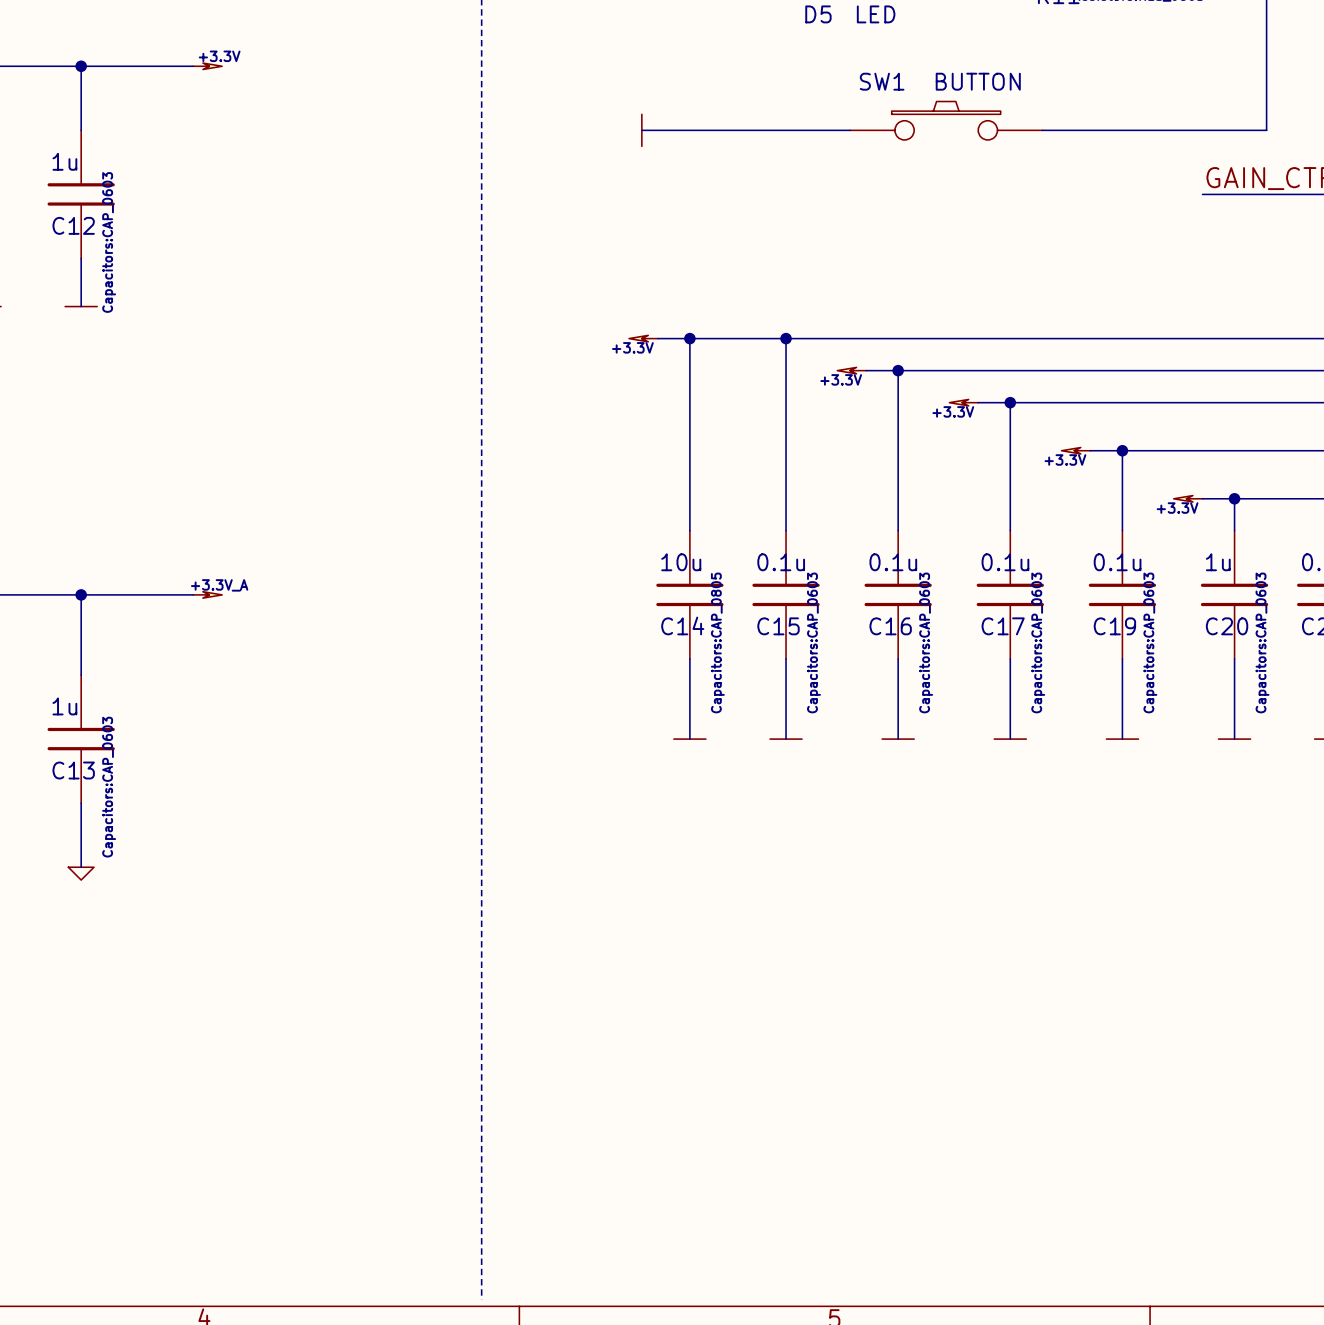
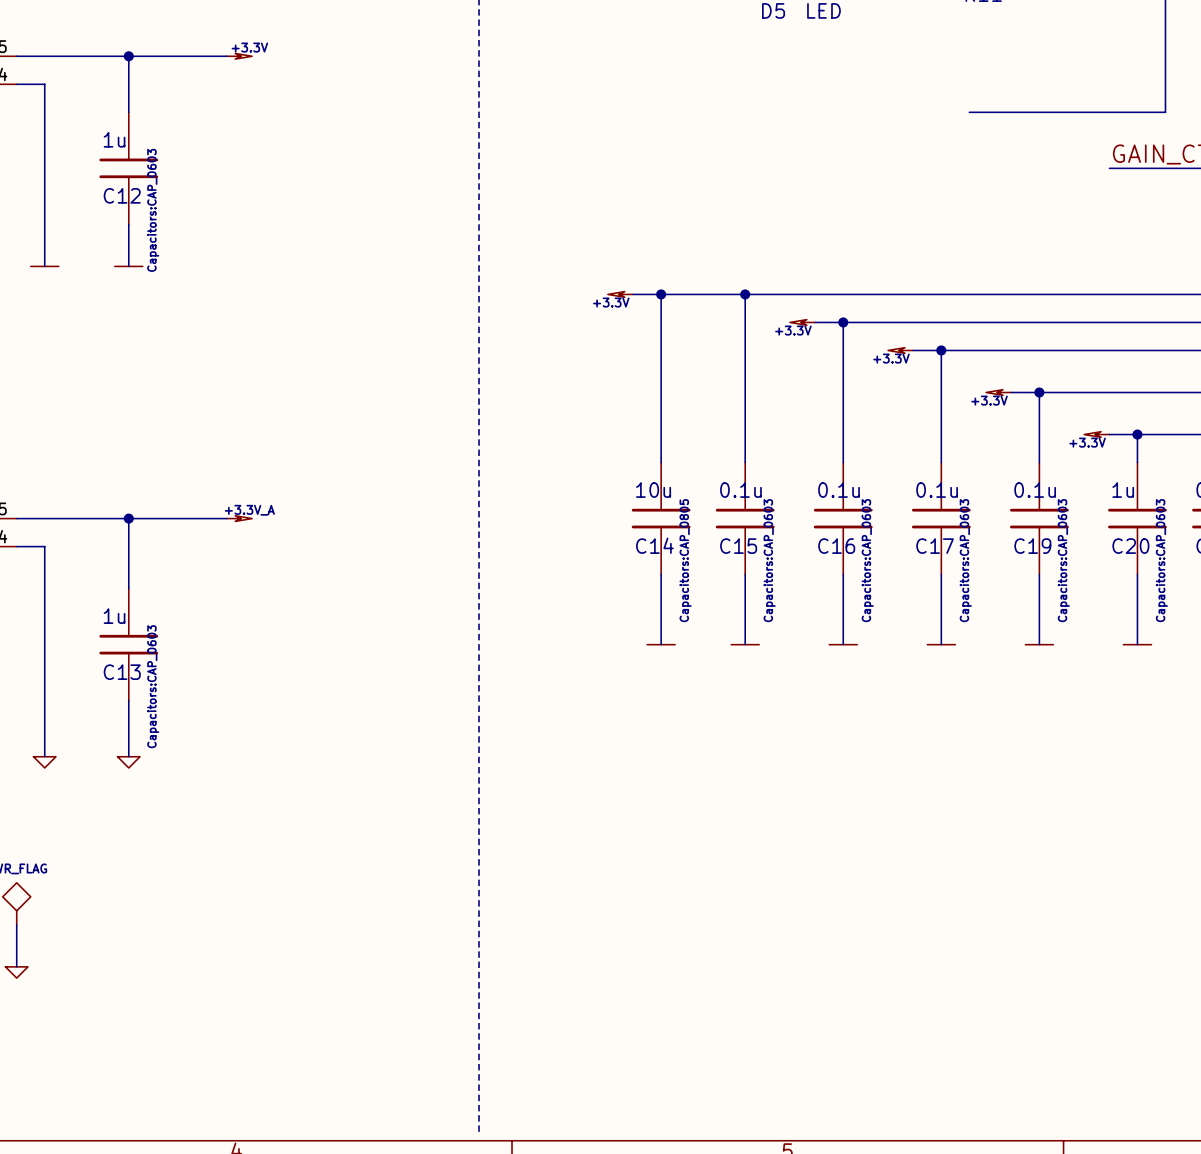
SW1: BUTTON (946, 120) -> none
wire: (641, 130) (850, 130) -> none
power symbol: (641, 130) -> none

